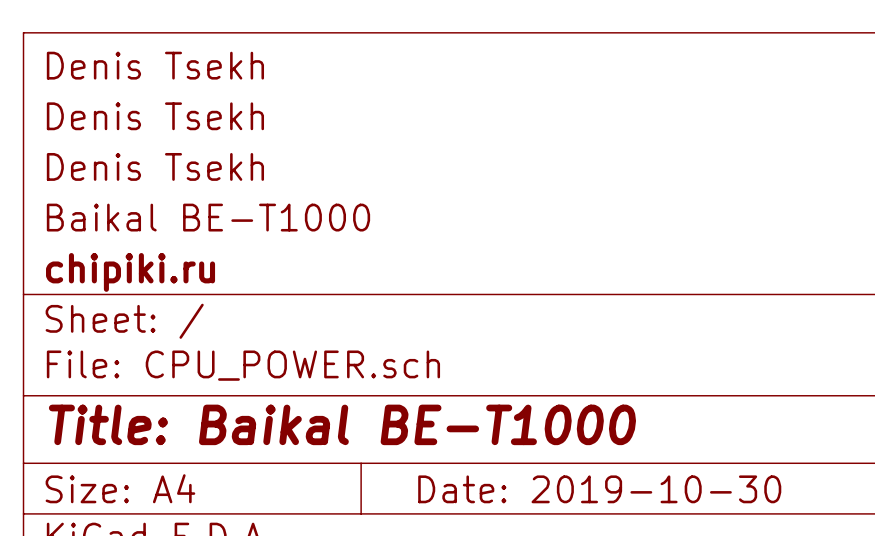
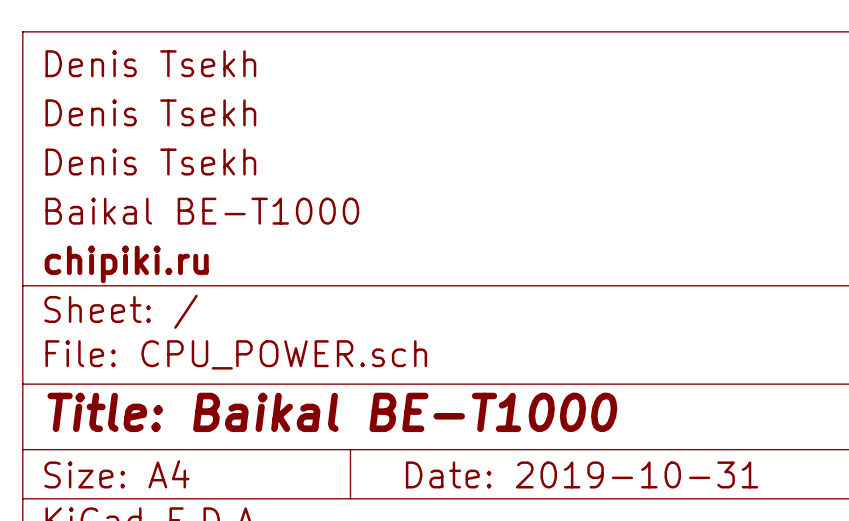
title block: Date: 2019-10-30 (599, 489) -> Date: 2019-10-31 (582, 474)

